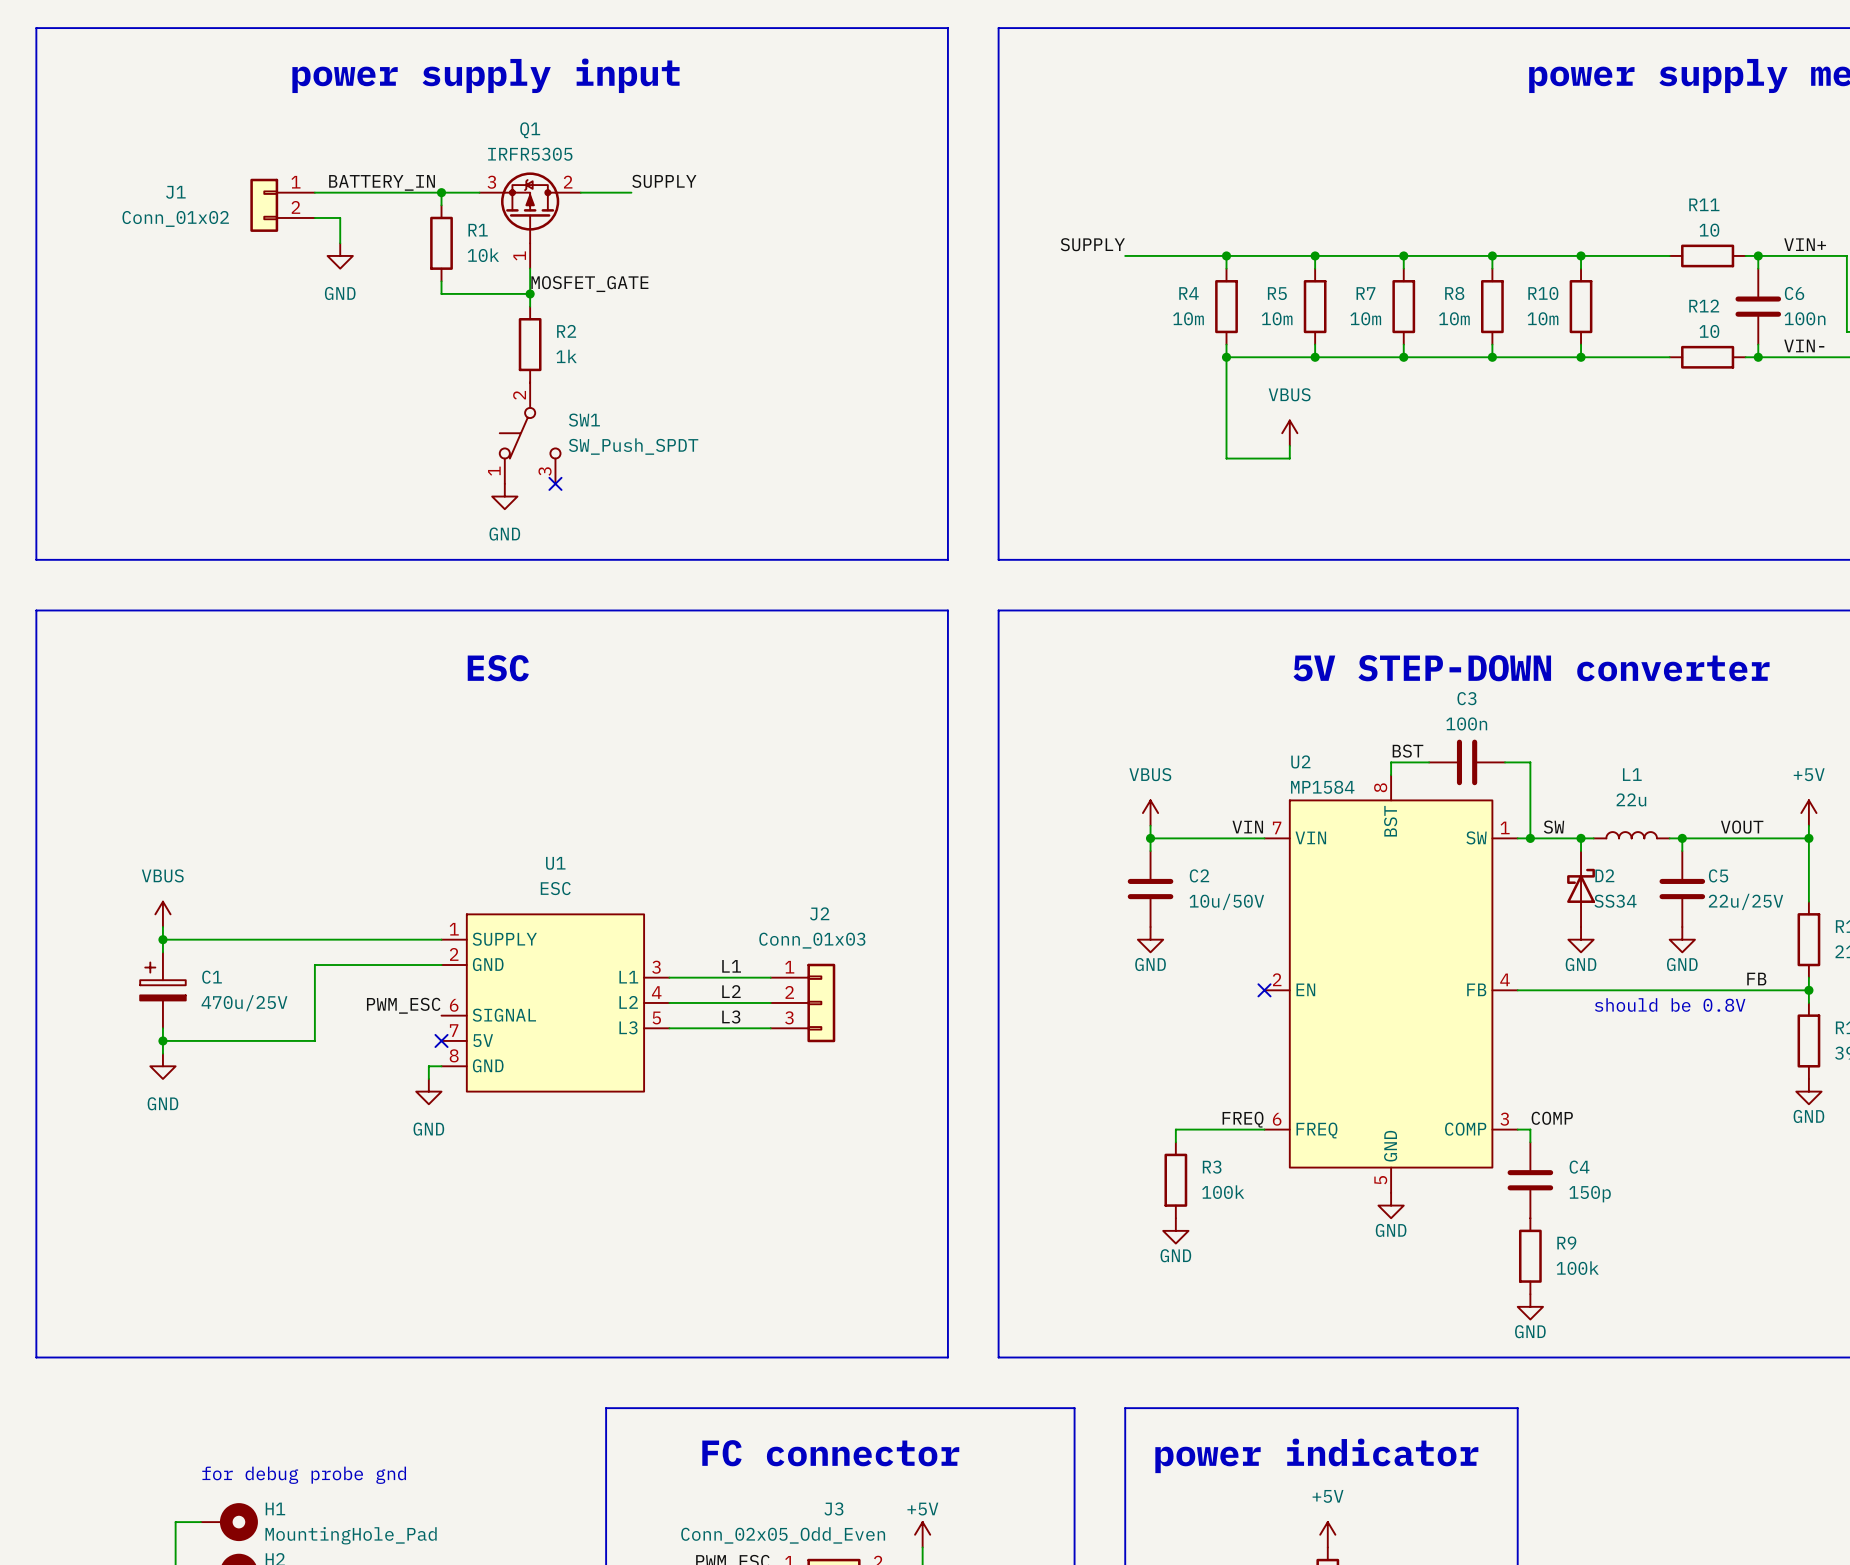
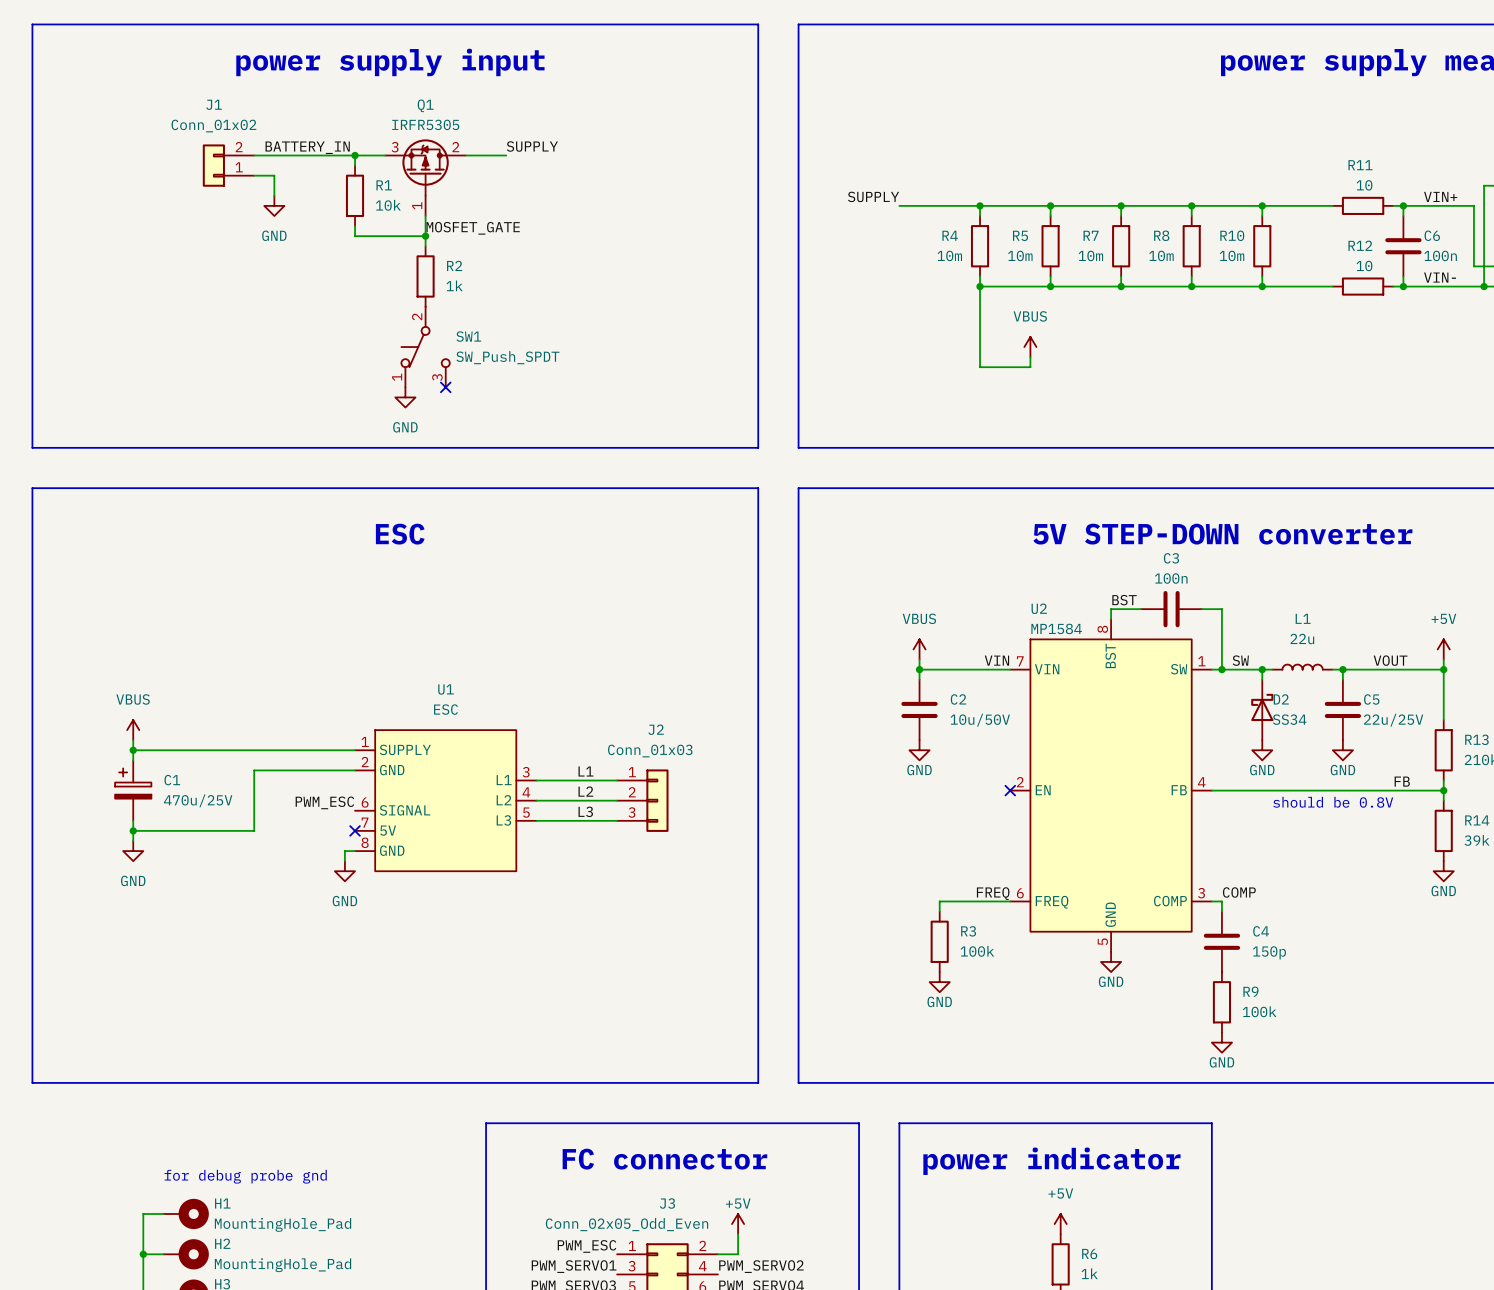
J1 name position: J1 (175, 192) -> J1 (214, 104)
J1 flip: as is (264, 205) -> up-down (213, 165)
J1 value position: Conn_01x02 (175, 218) -> Conn_01x02 (213, 126)

